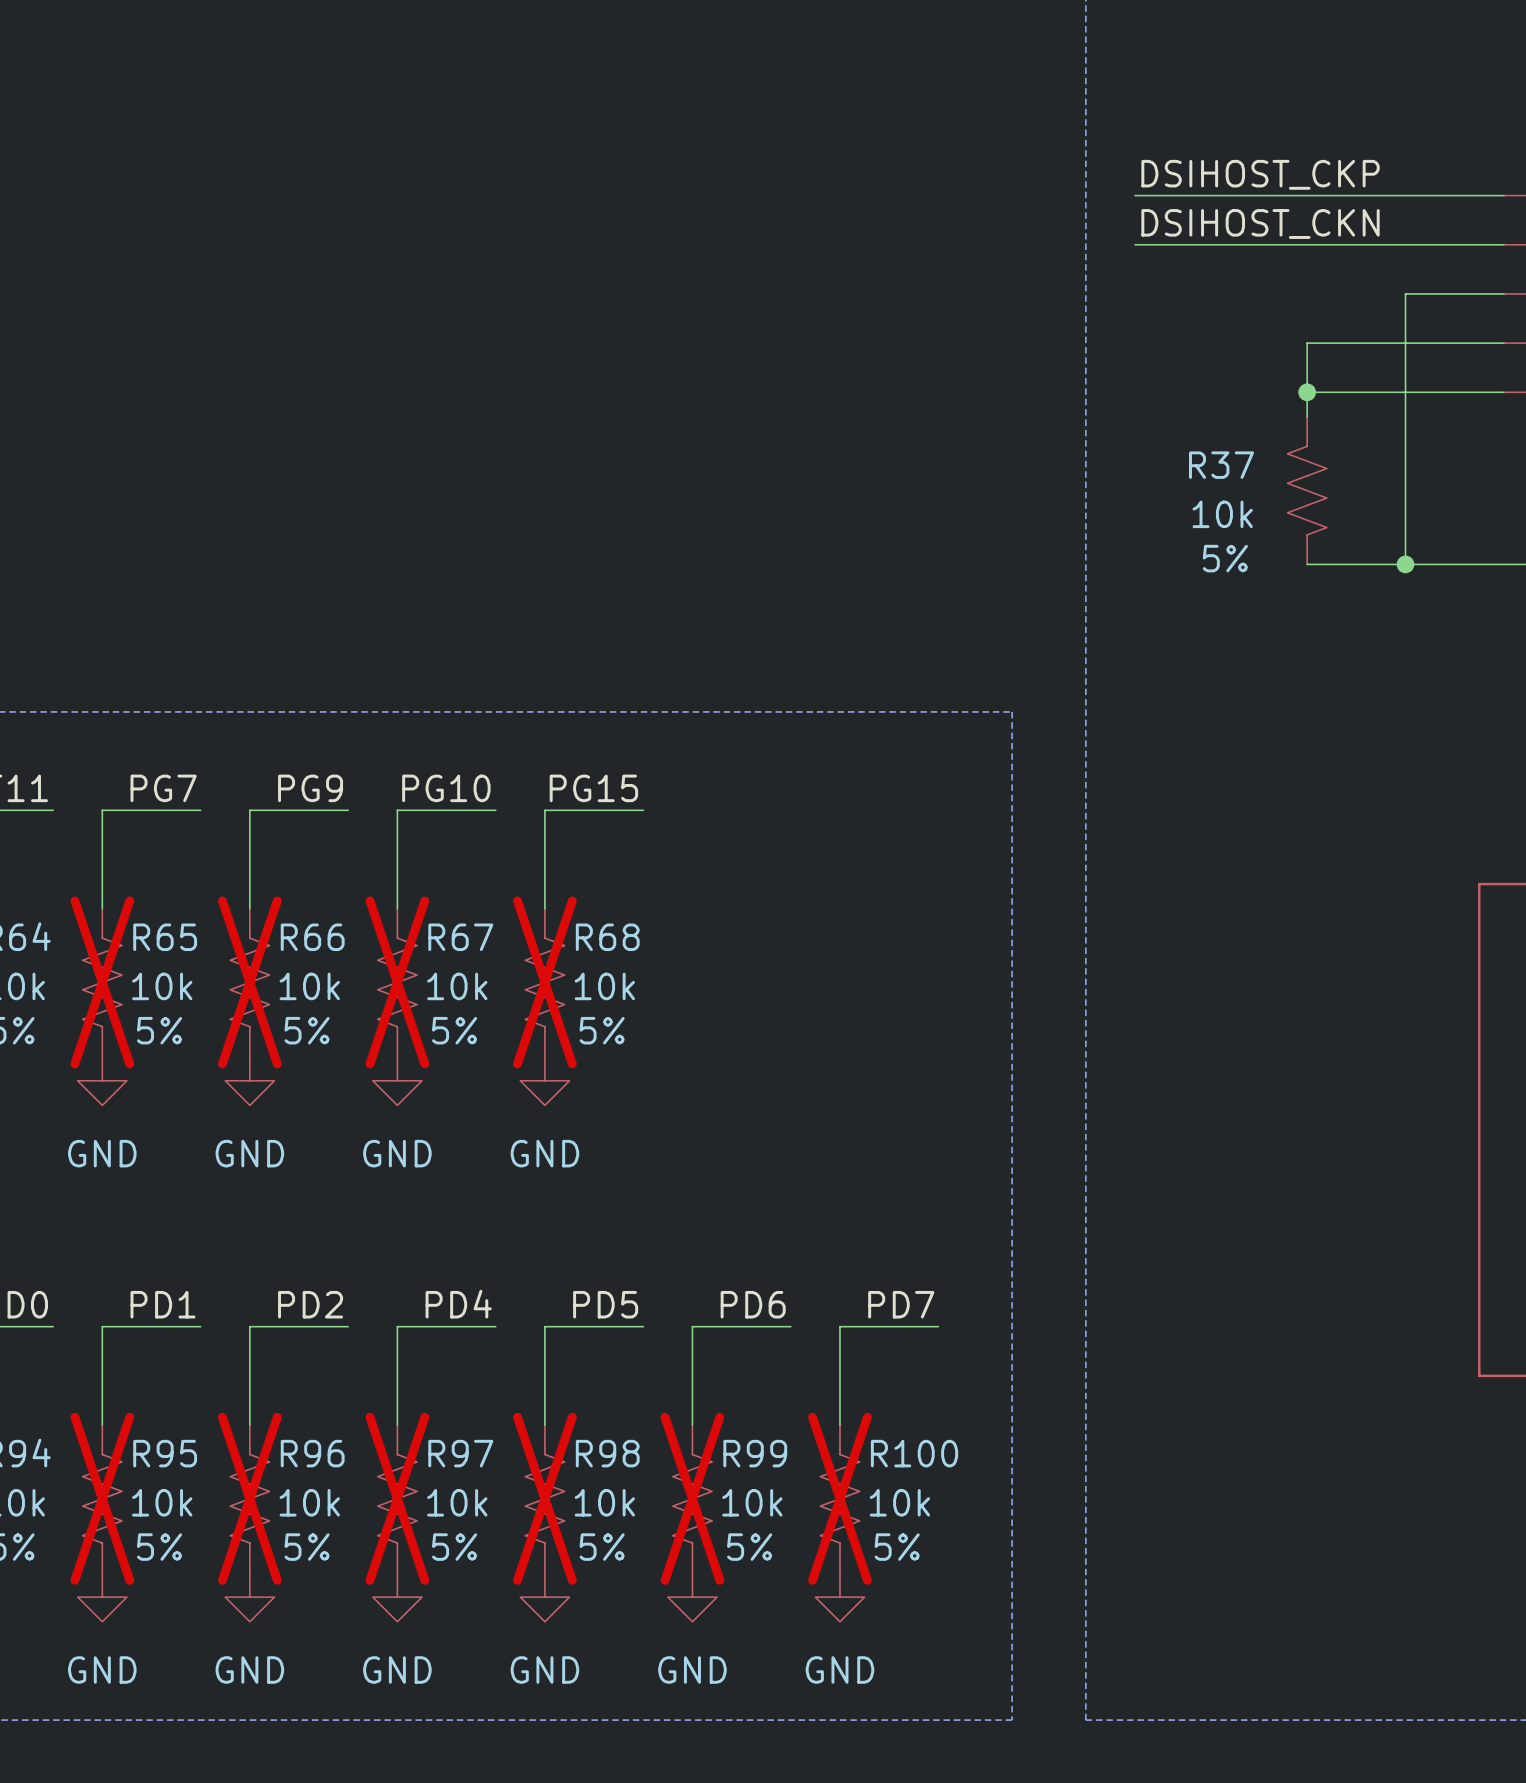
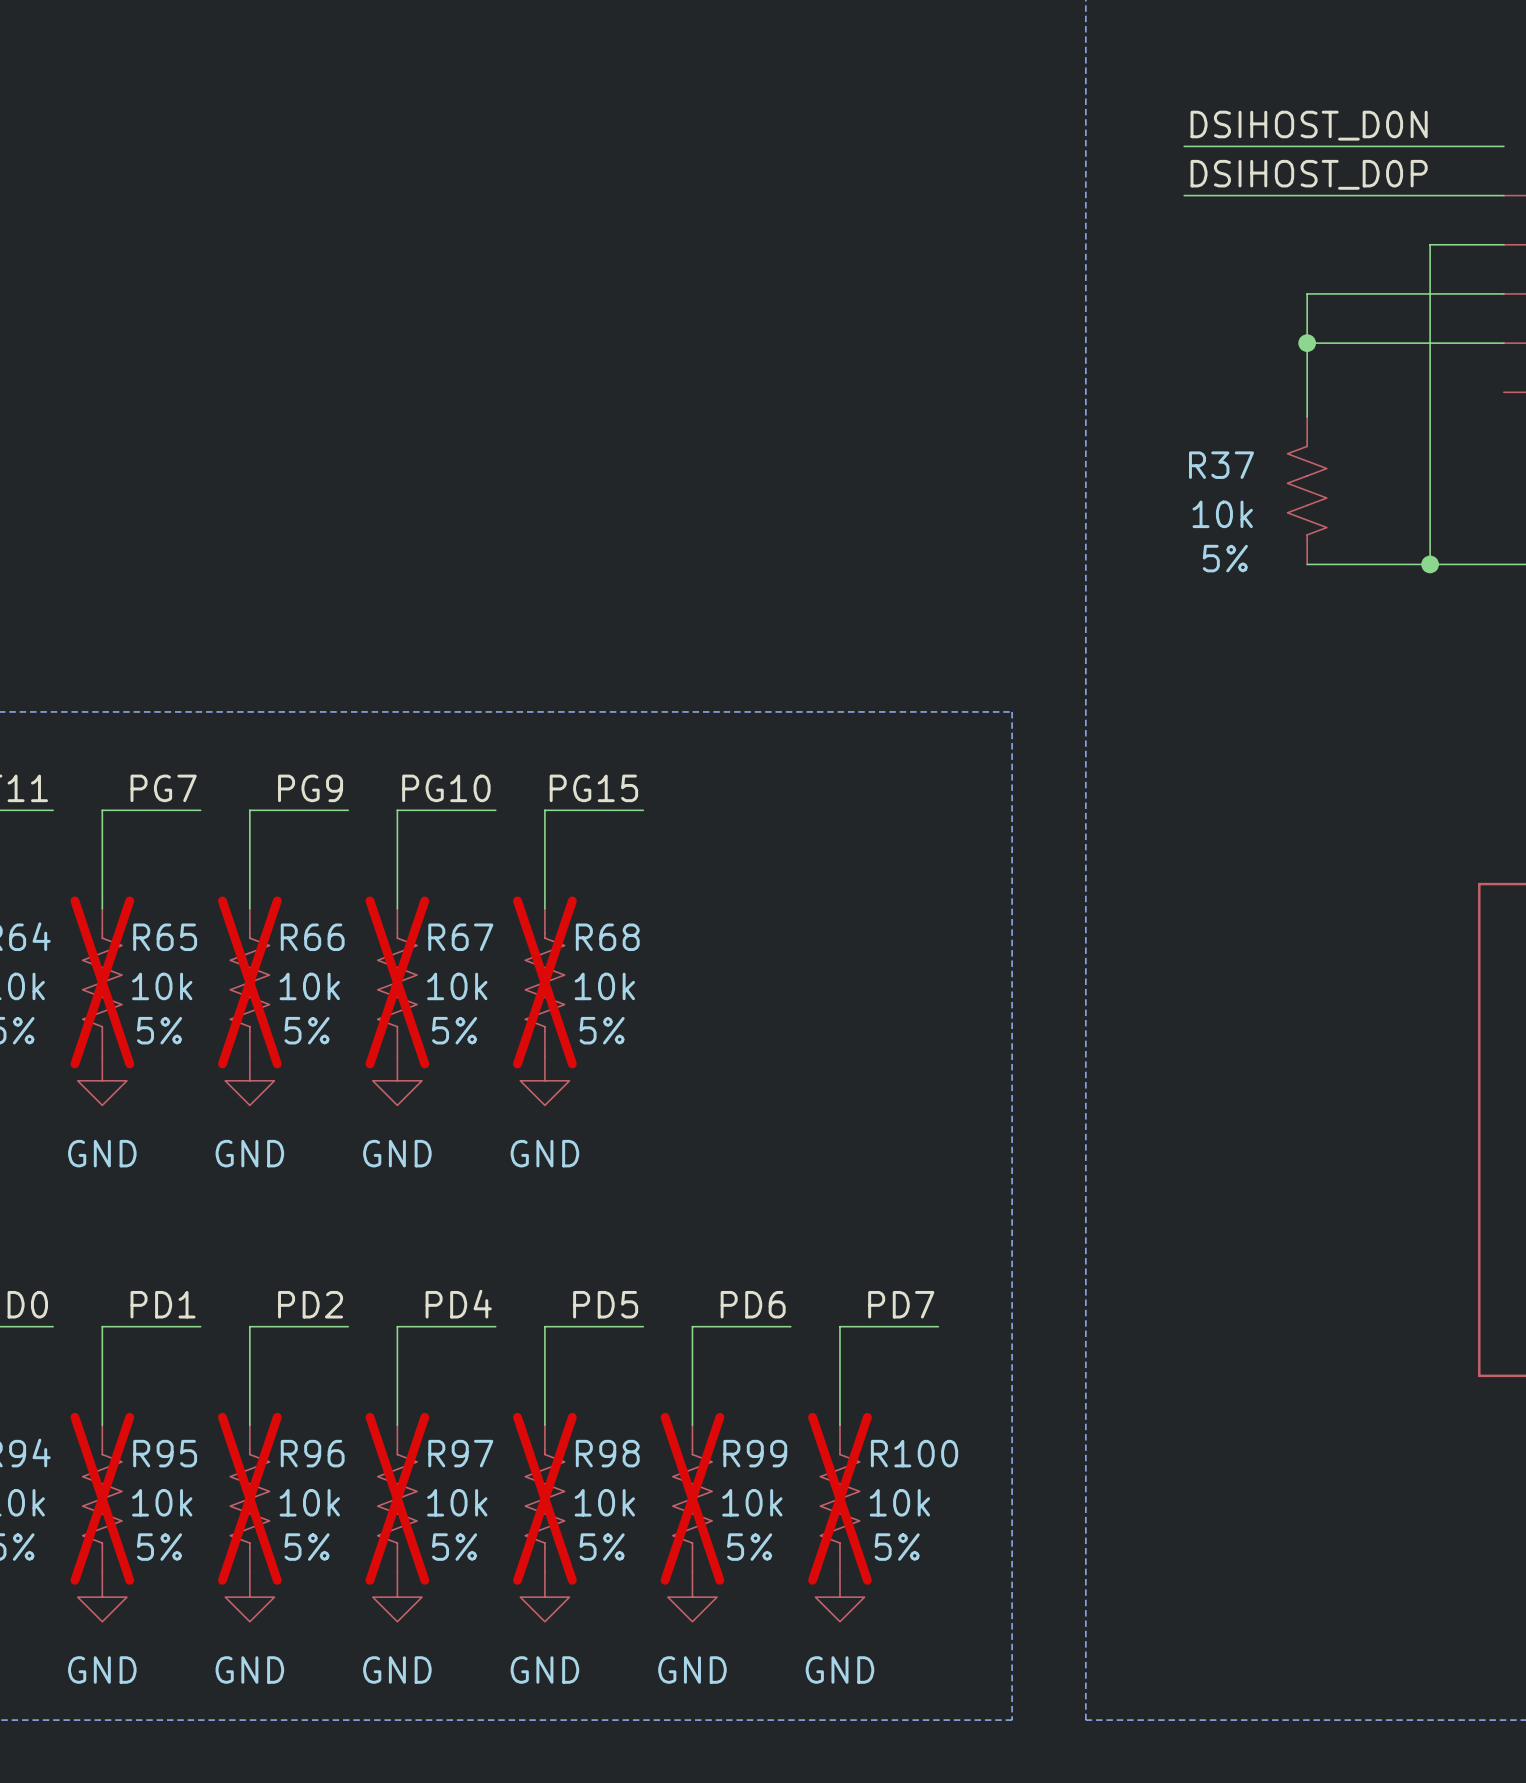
label: none -> DSIHOST_D0N (1309, 125)
wire: none -> (1184, 146) (1503, 146)
label: DSIHOST_CKP (1260, 174) -> none
label: none -> DSIHOST_D0P (1309, 174)
wire: (1135, 195) (1184, 195) -> none
label: DSIHOST_CKN (1260, 224) -> none
wire: (1135, 244) (1430, 244) -> (1430, 564) (1430, 244)
wire: (1405, 293) (1405, 564) -> (1405, 293) (1307, 293) (1307, 343)
wire: (1307, 392) (1503, 392) -> none
junction position: (1307, 392) -> (1307, 343)
junction position: (1405, 564) -> (1430, 564)

